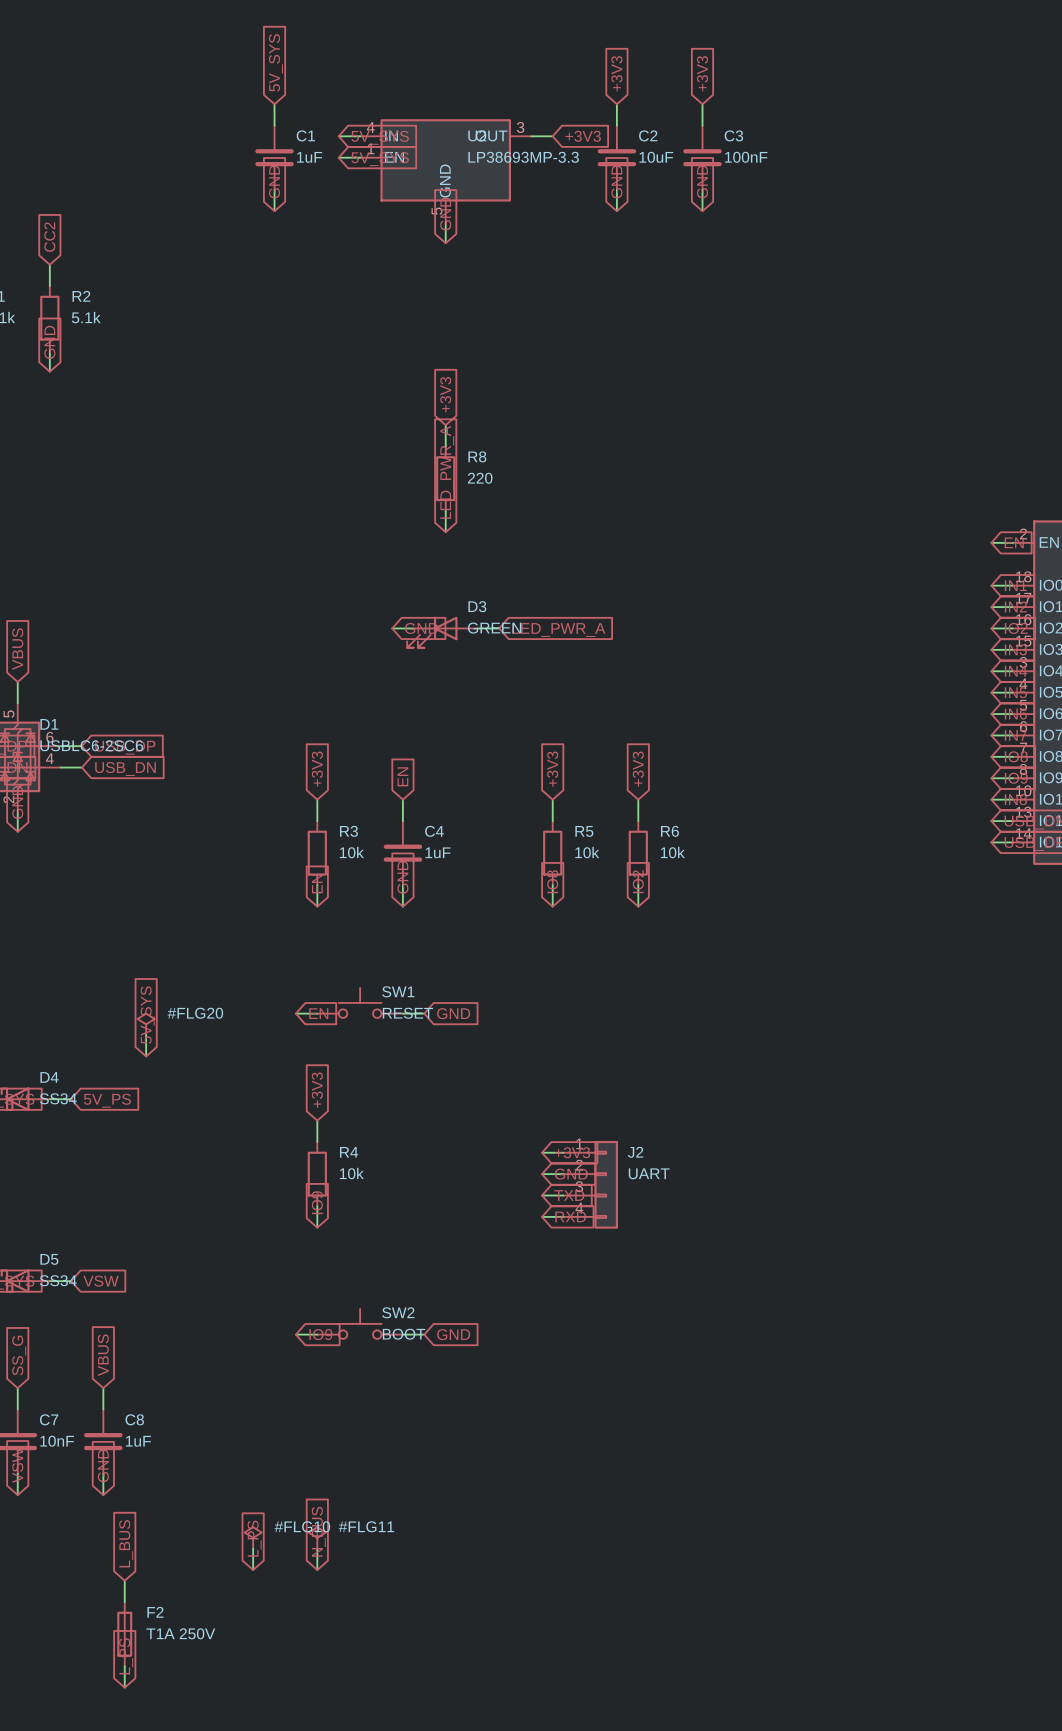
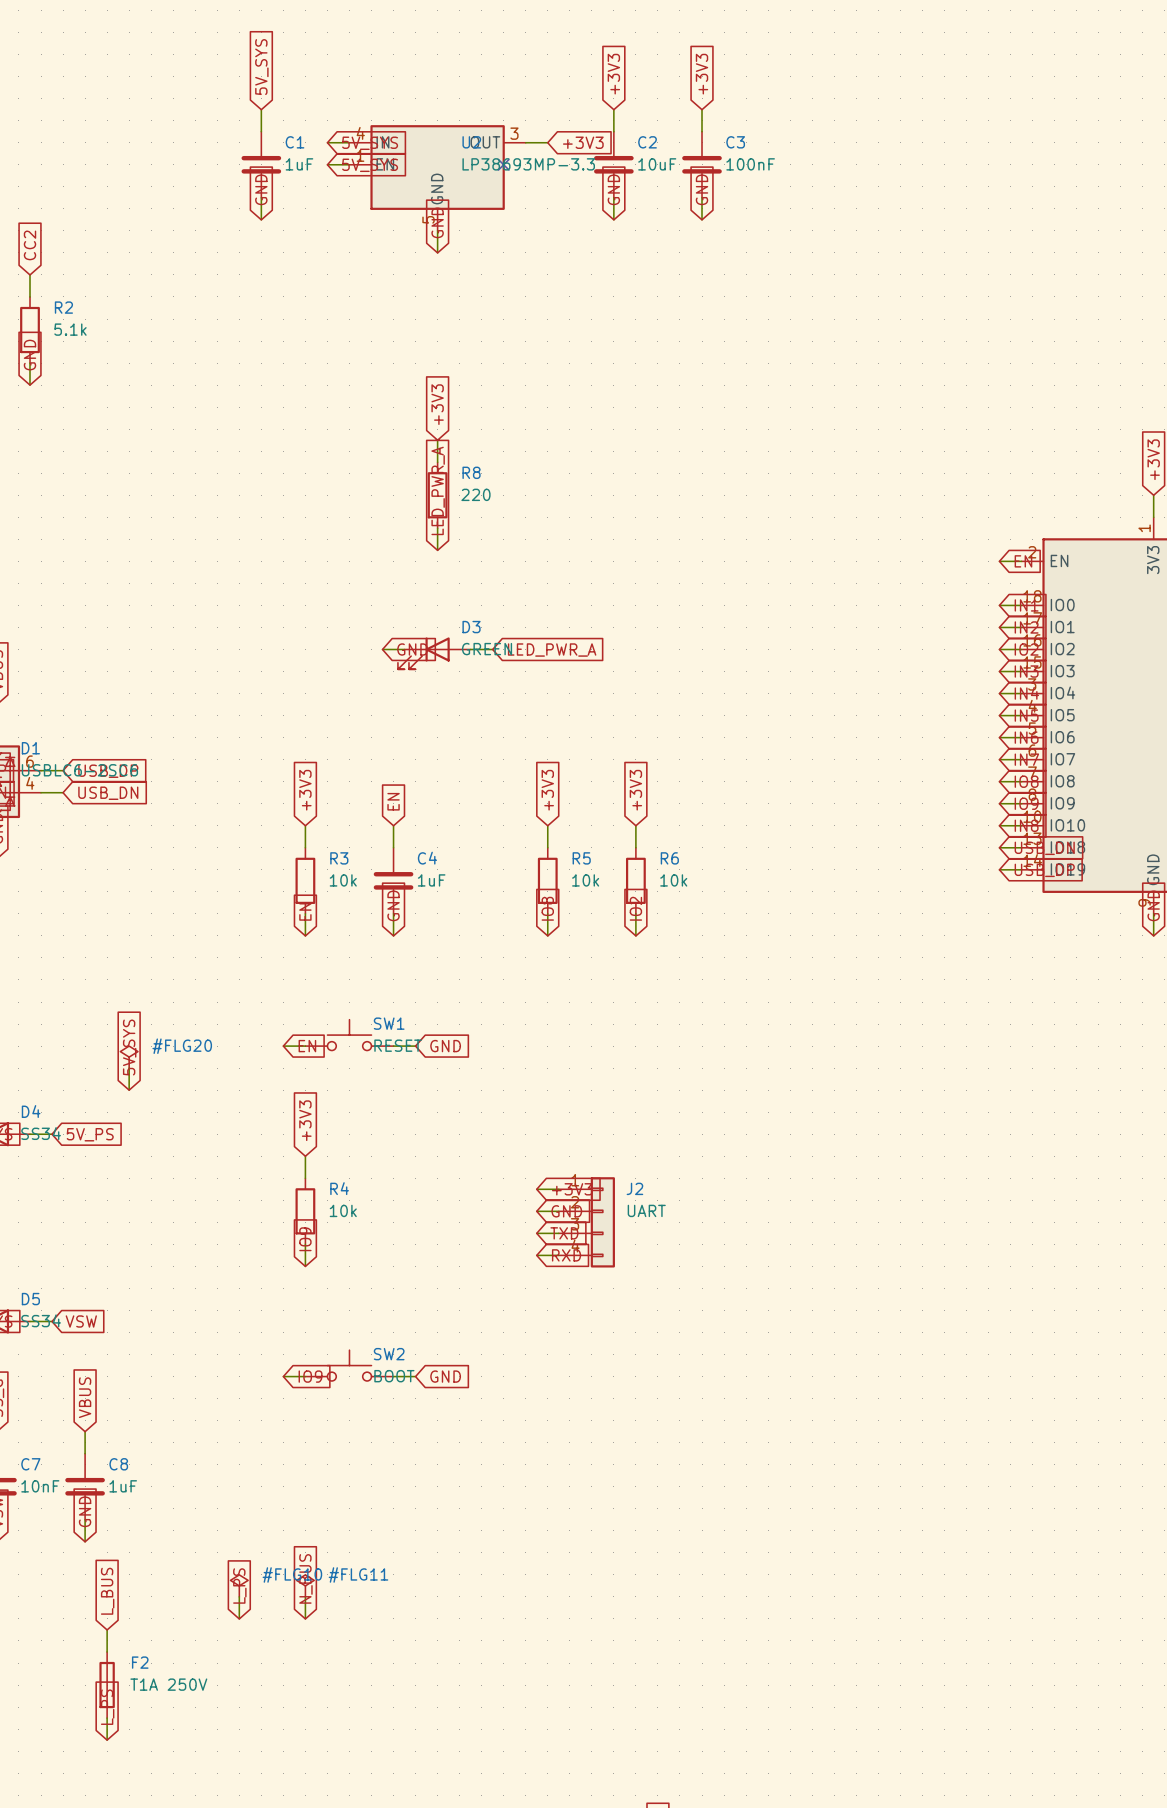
no-connect mark: none -> (503, 164)

